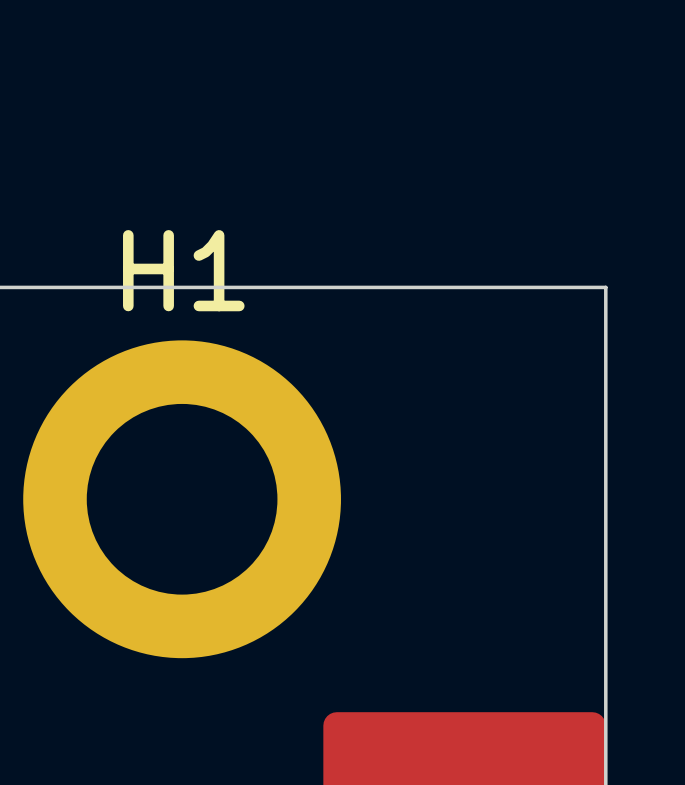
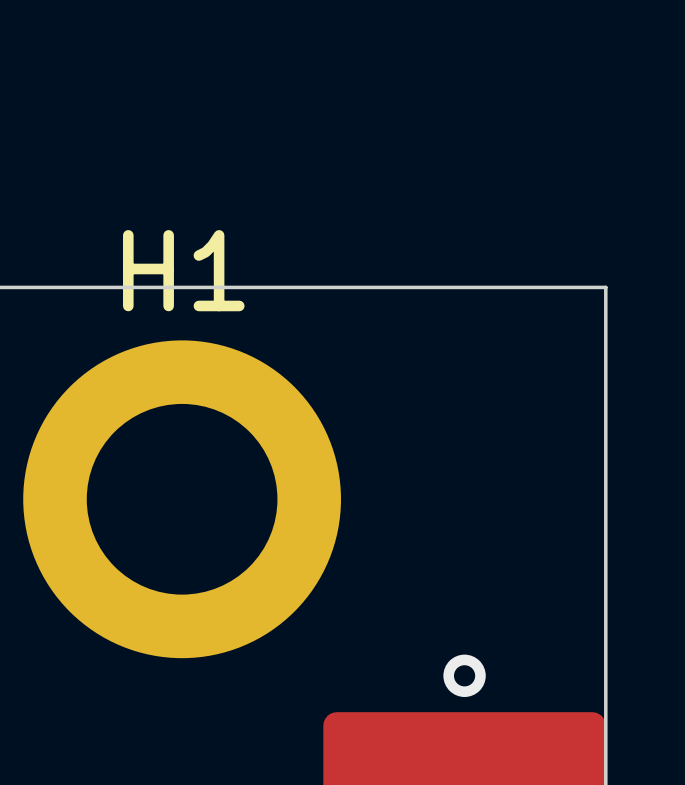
via: none -> (464, 675)

